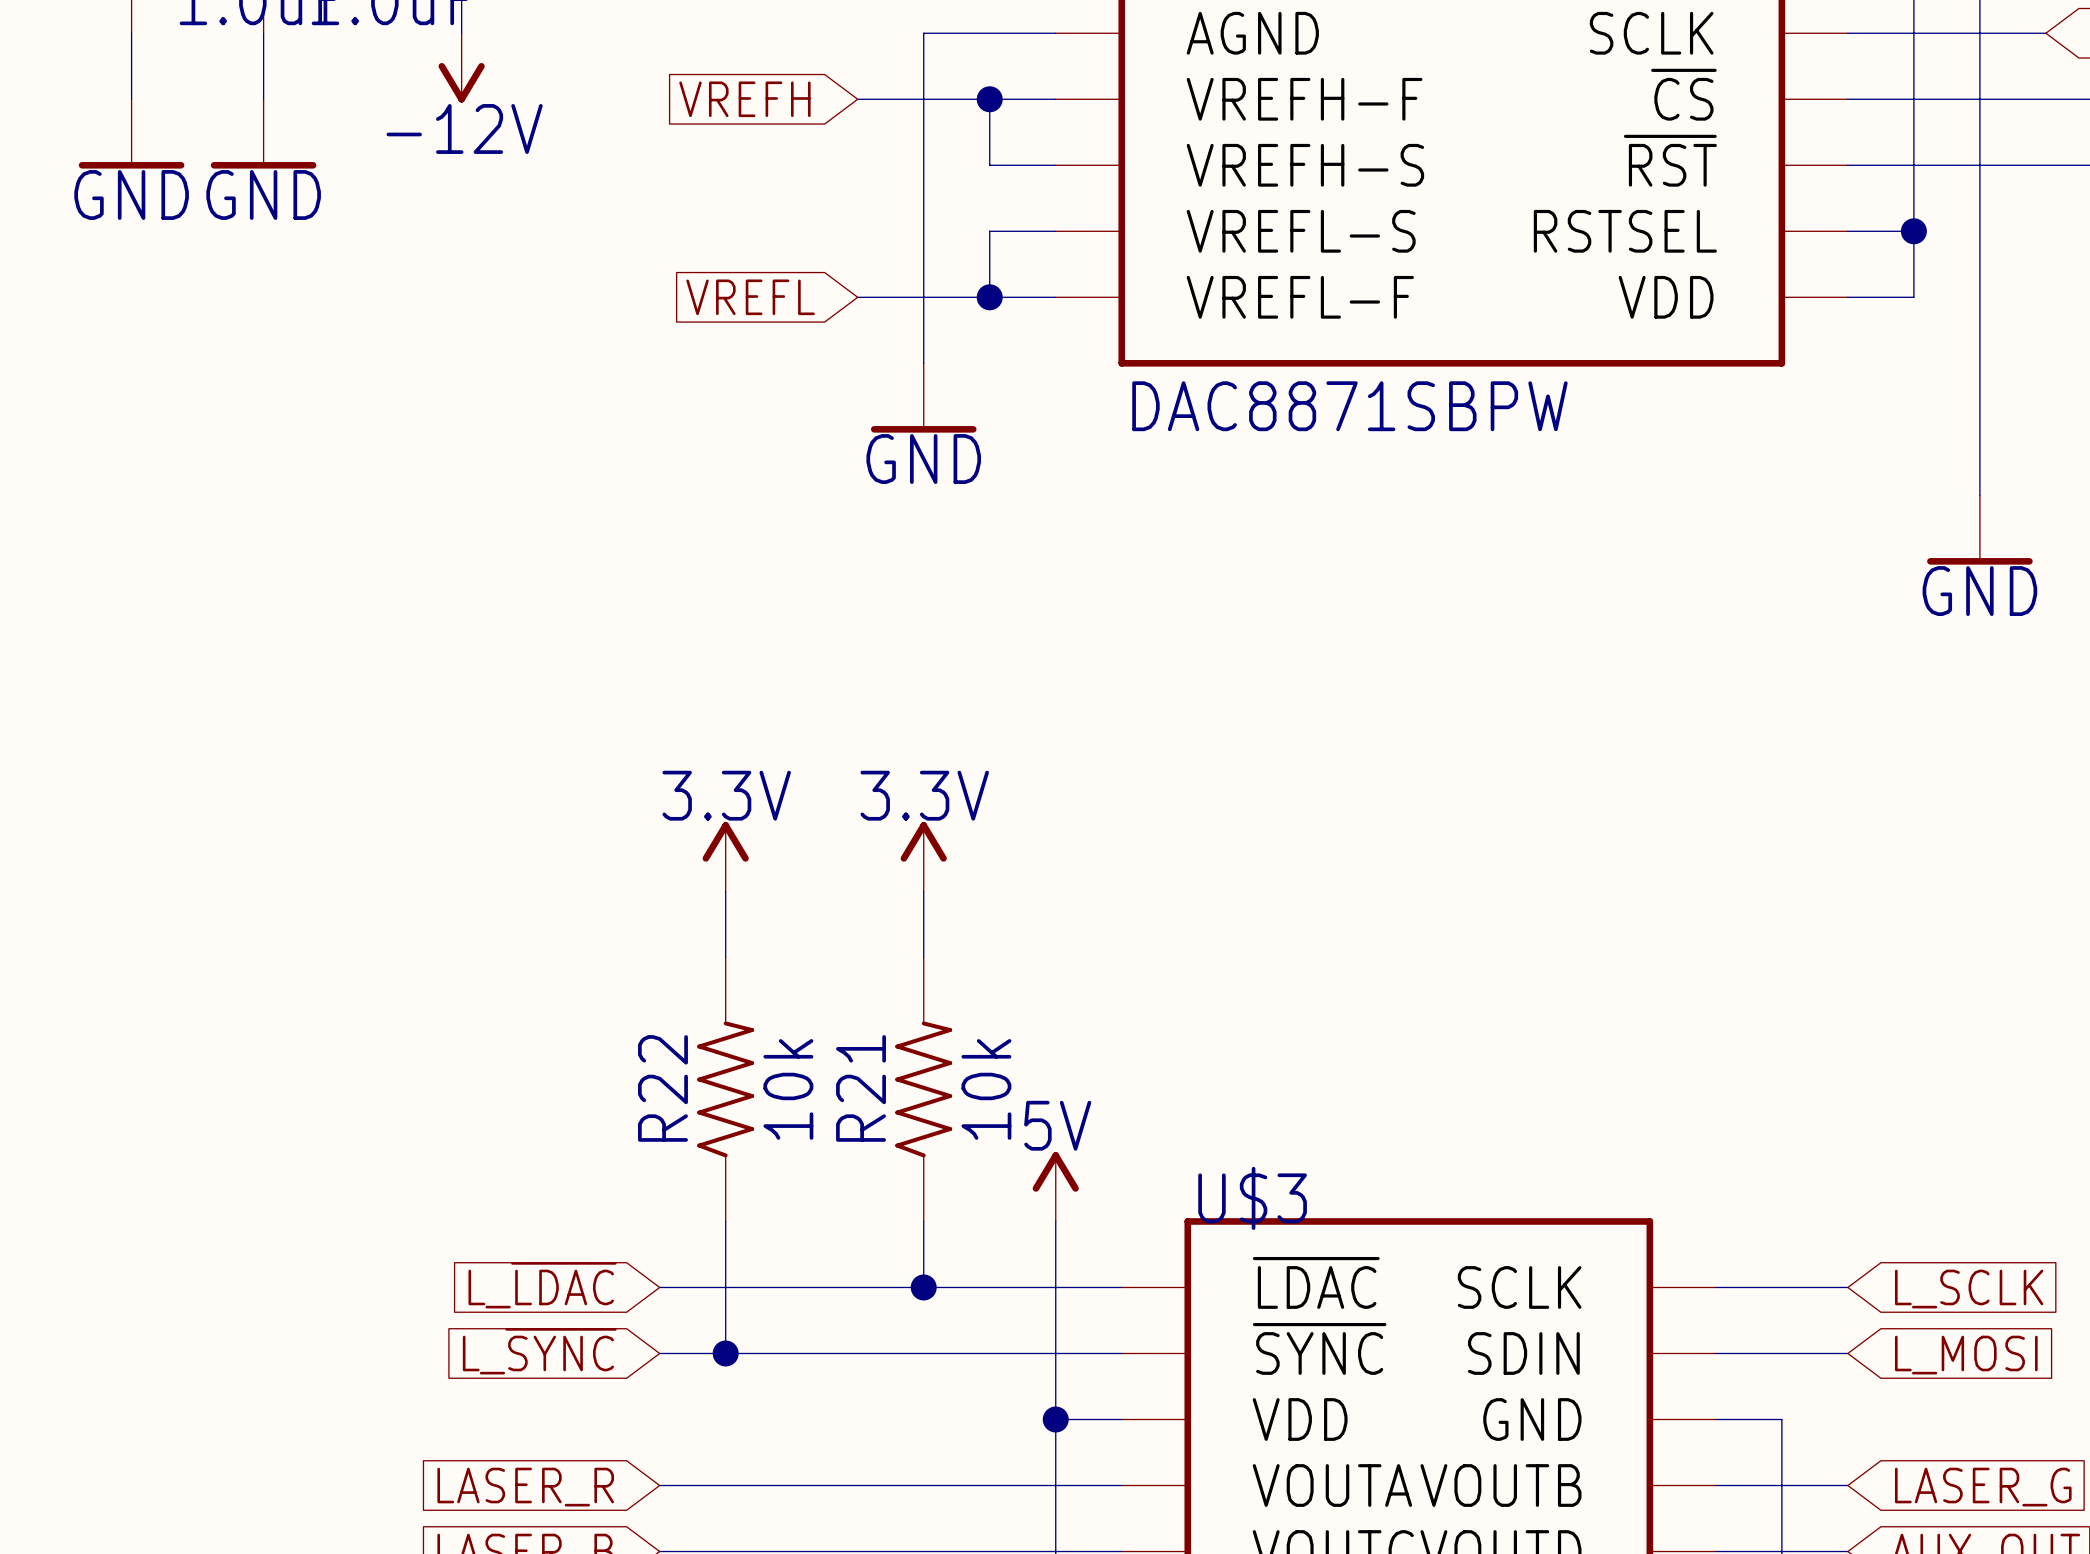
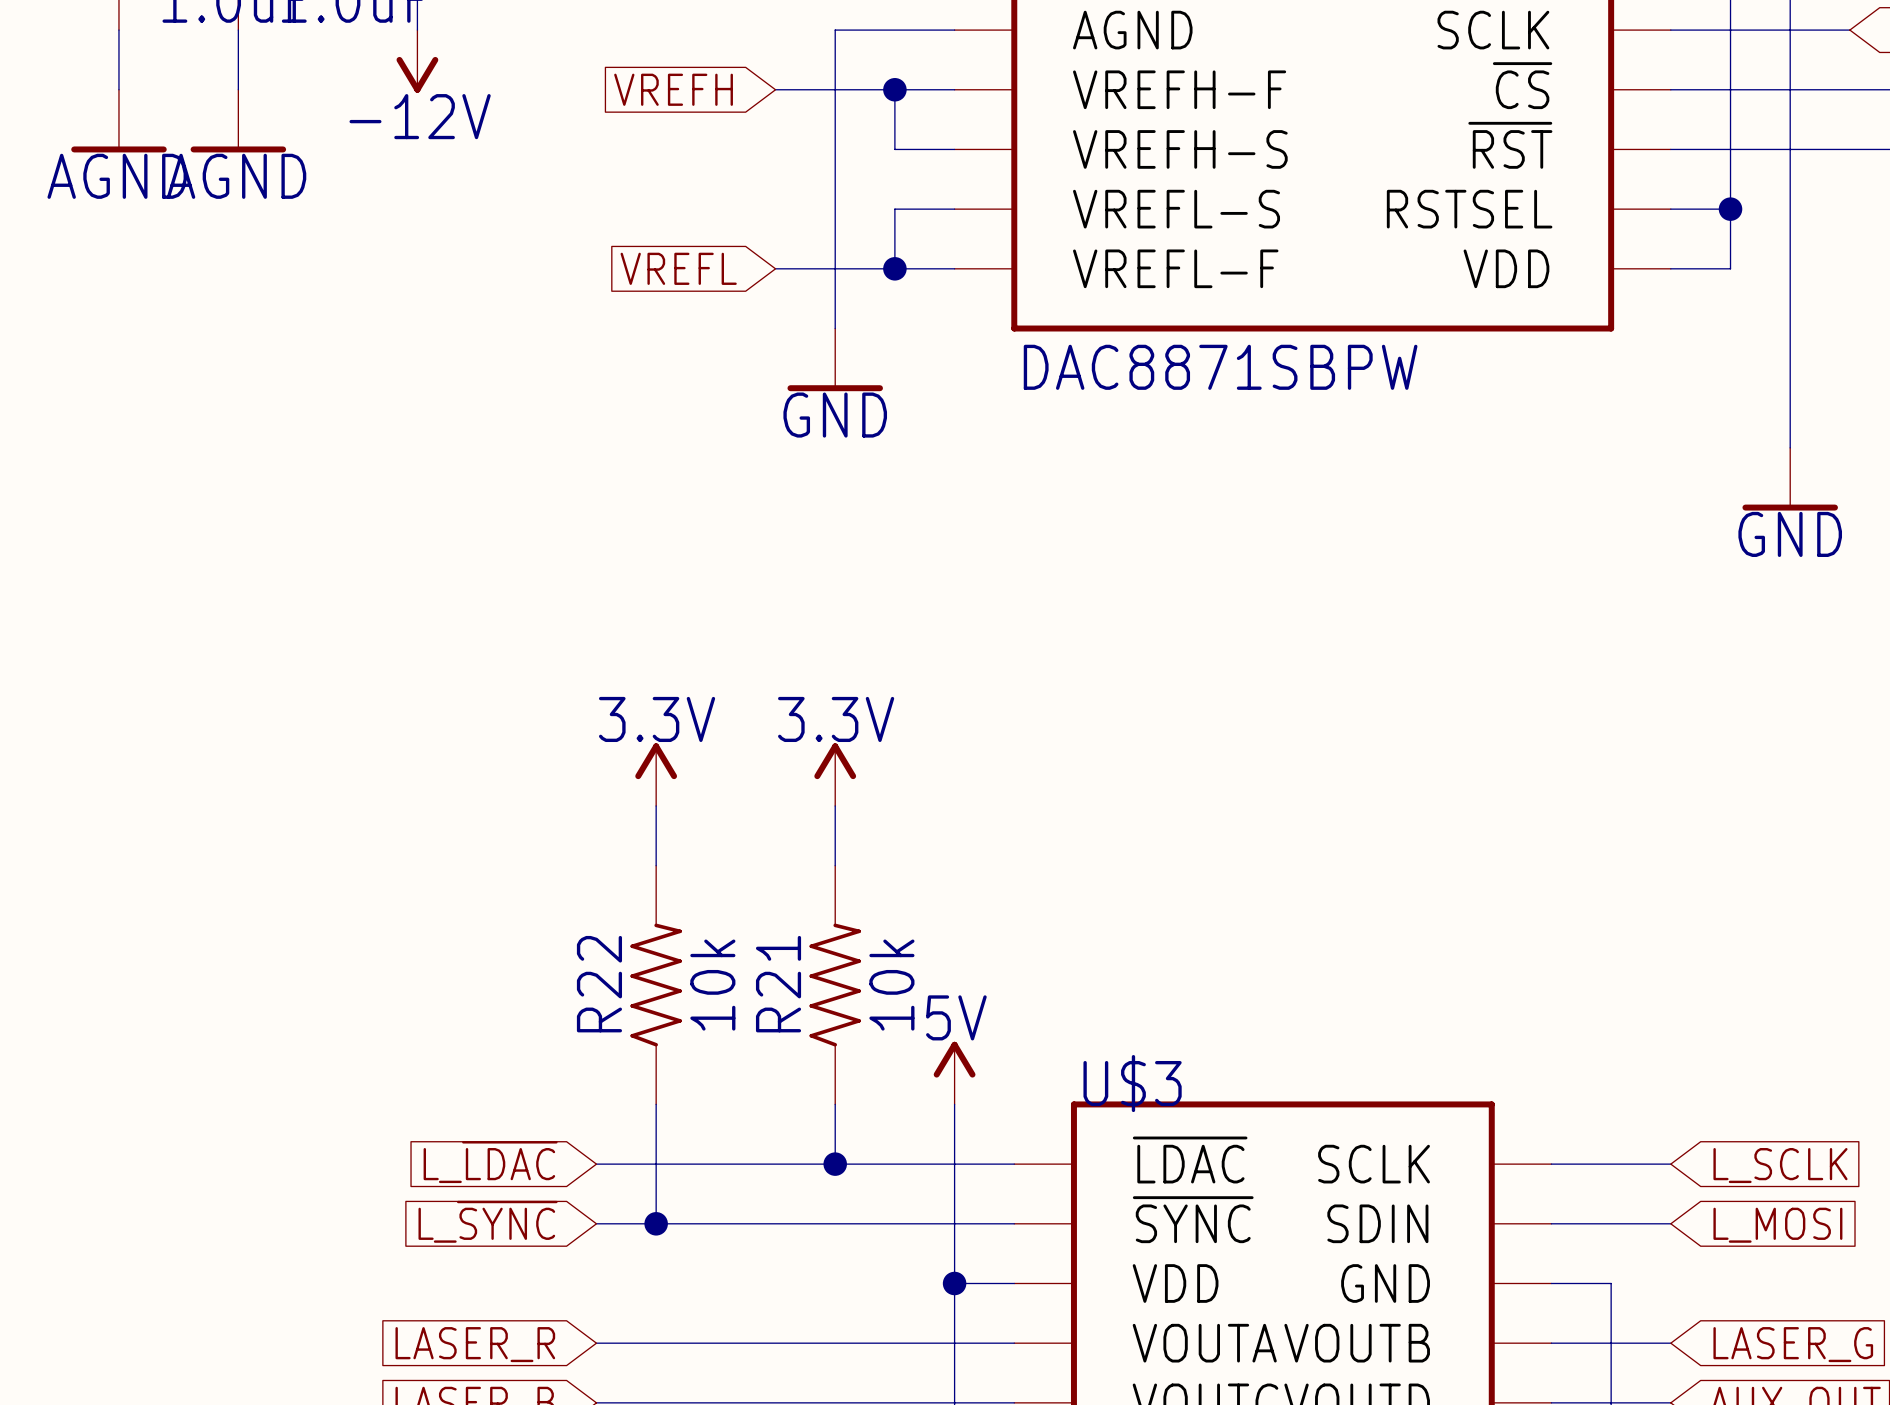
power symbol: GND (131, 133) -> AGND (118, 121)
power symbol: GND (263, 133) -> AGND (238, 121)

